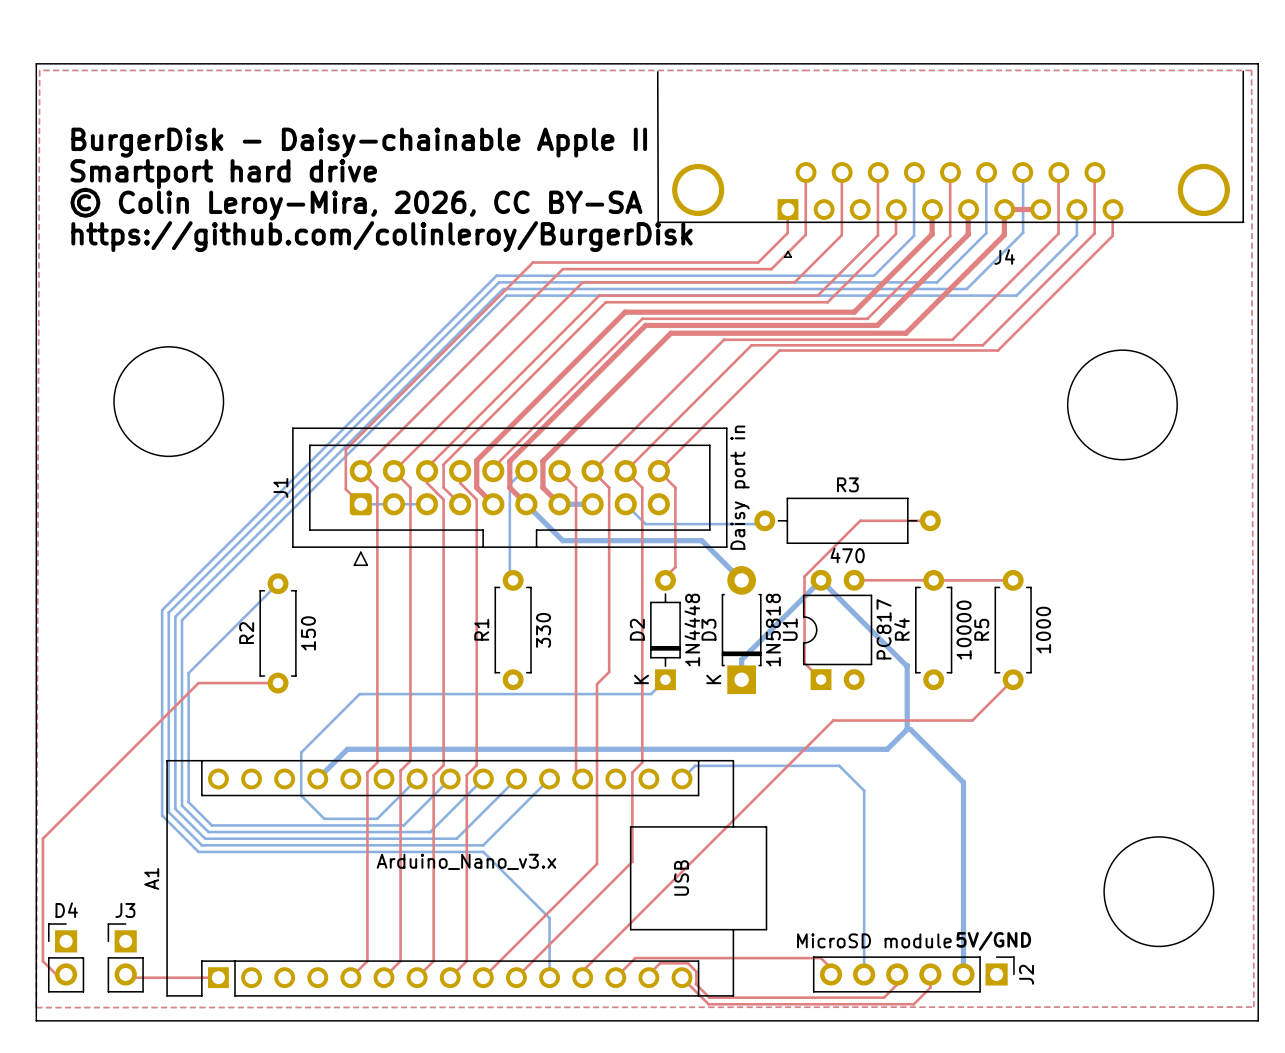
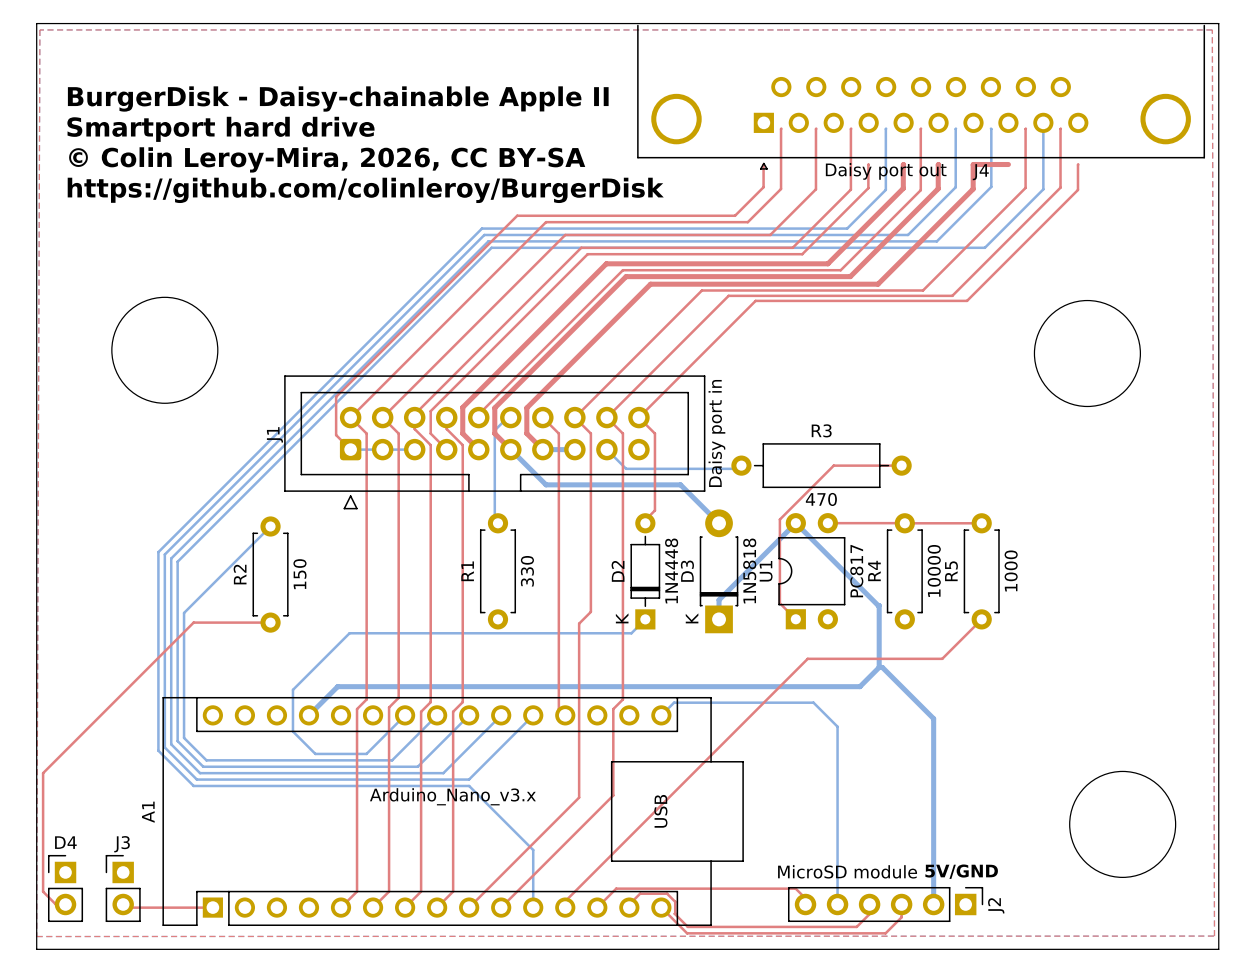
J4 footprint: [656, 70, 1245, 258] -> [637, 24, 1206, 170]
bottom track: none -> (1043, 122) (1043, 164)
J4 value: none -> Daisy port out (886, 171)

